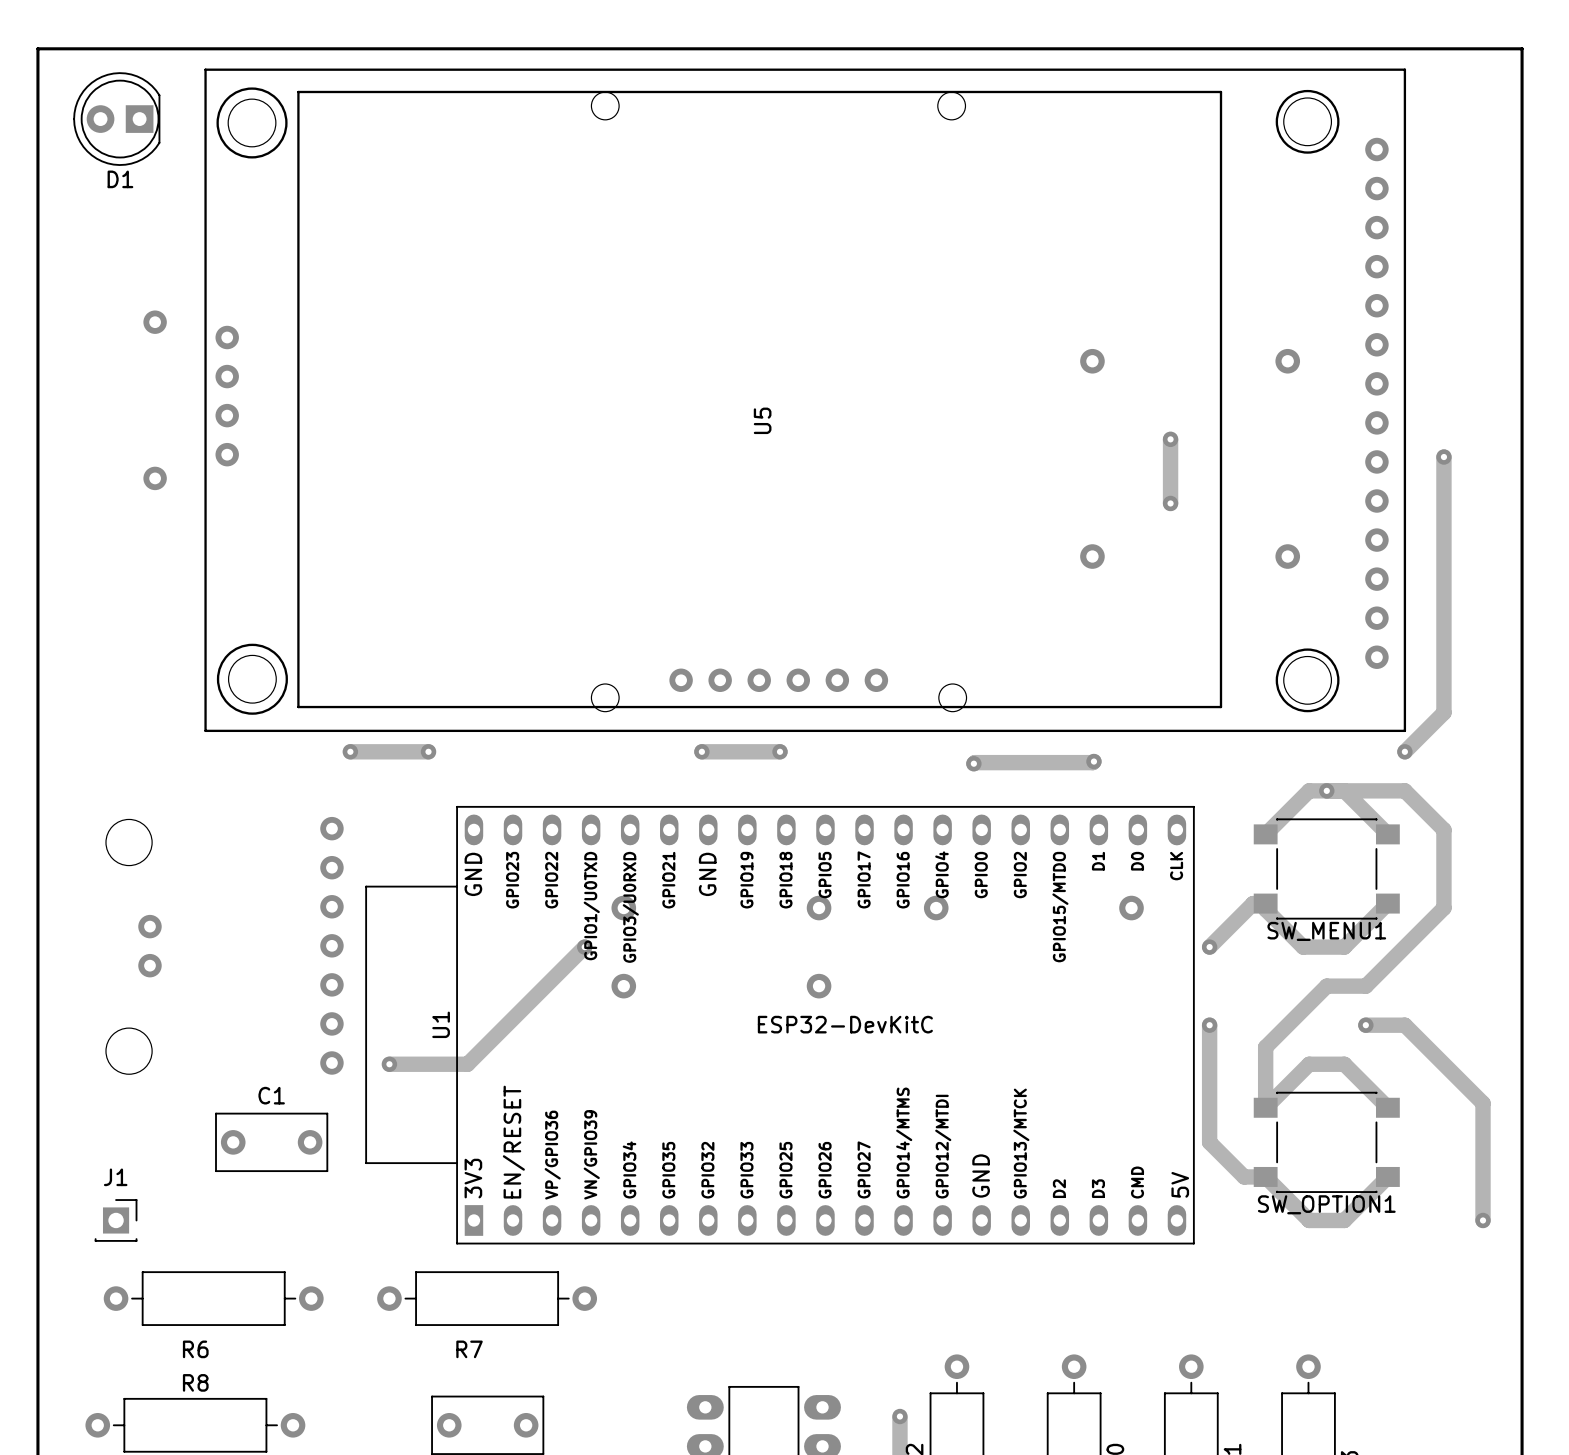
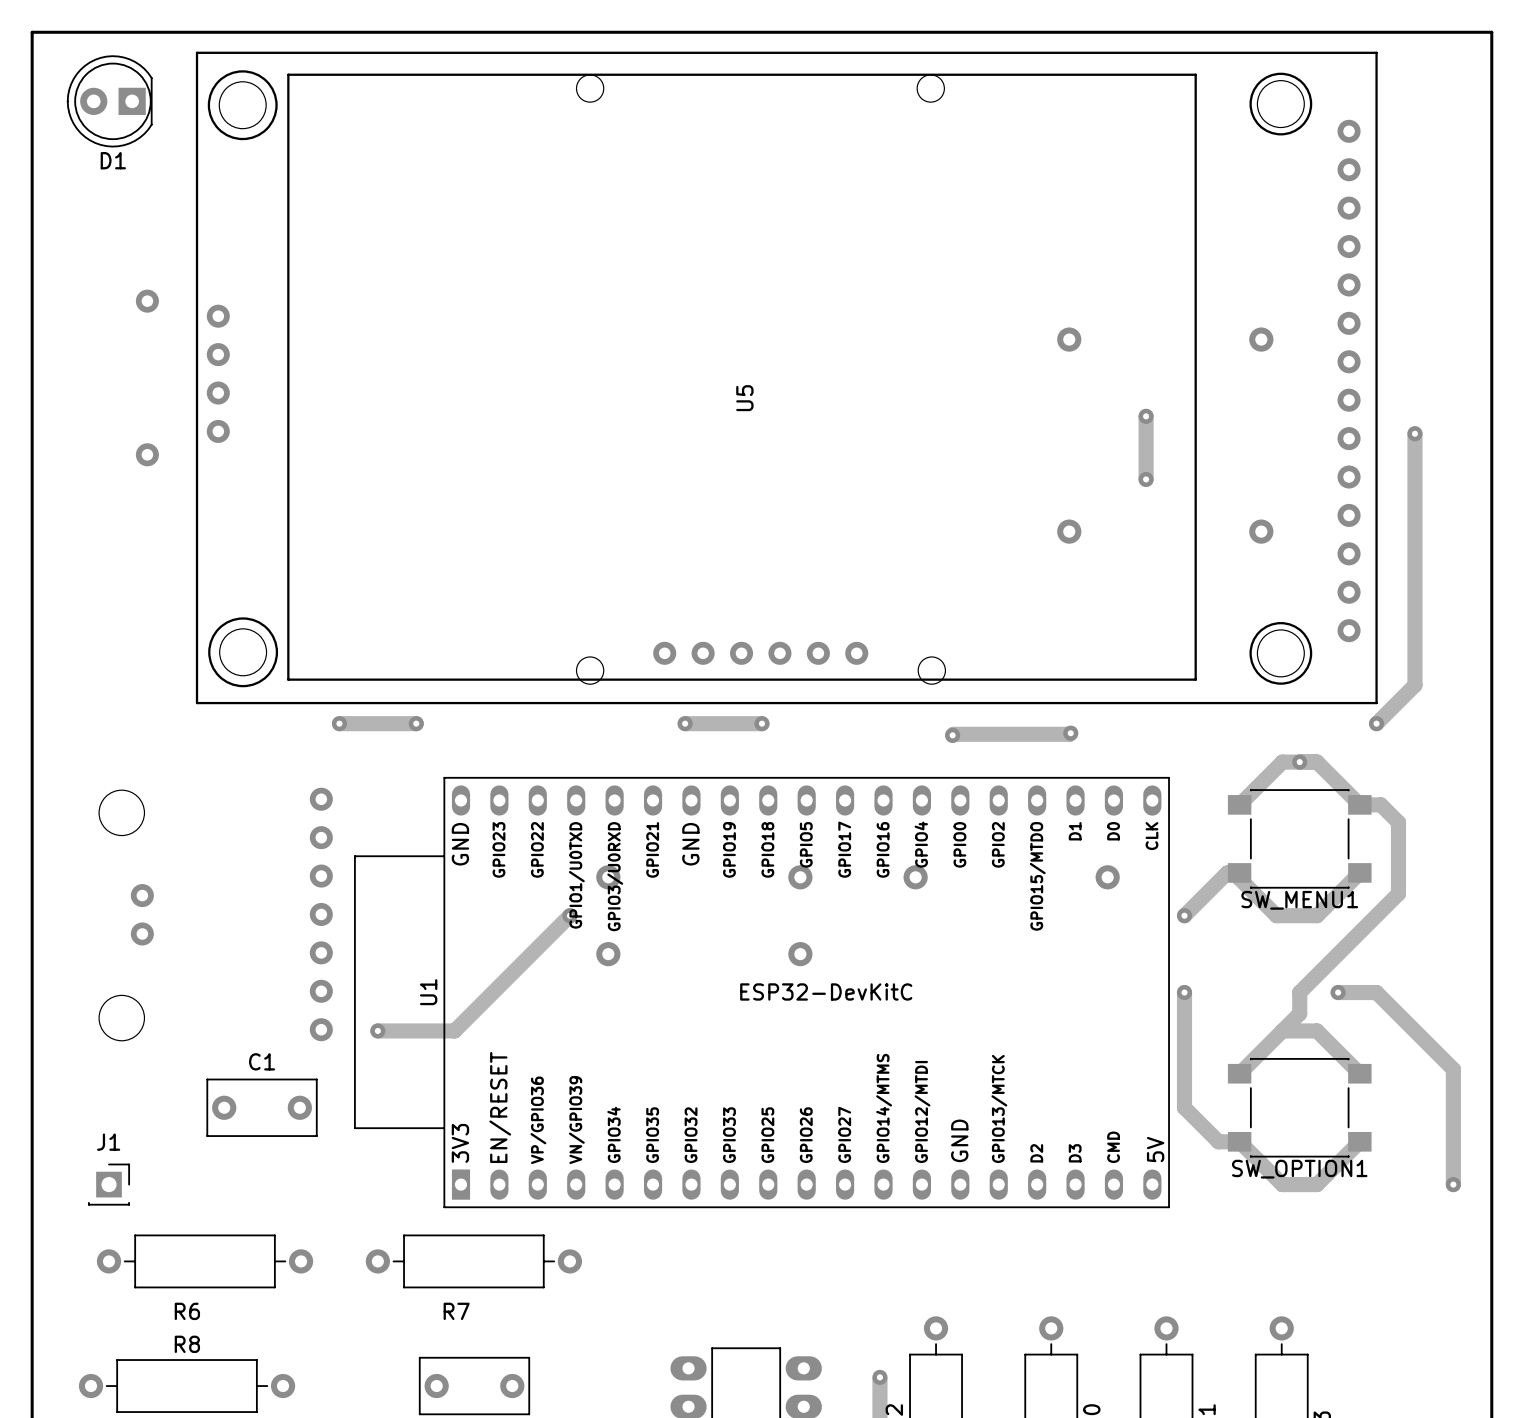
track: (1344, 790) (1404, 790) (1443, 829) (1443, 908) (1427, 924) -> (1359, 804) (1380, 804) (1398, 822) (1398, 893)
track: (1365, 986) (1326, 986) (1265, 1047) (1265, 1107) -> (1338, 954) (1299, 992) (1299, 1013) (1282, 1030)

